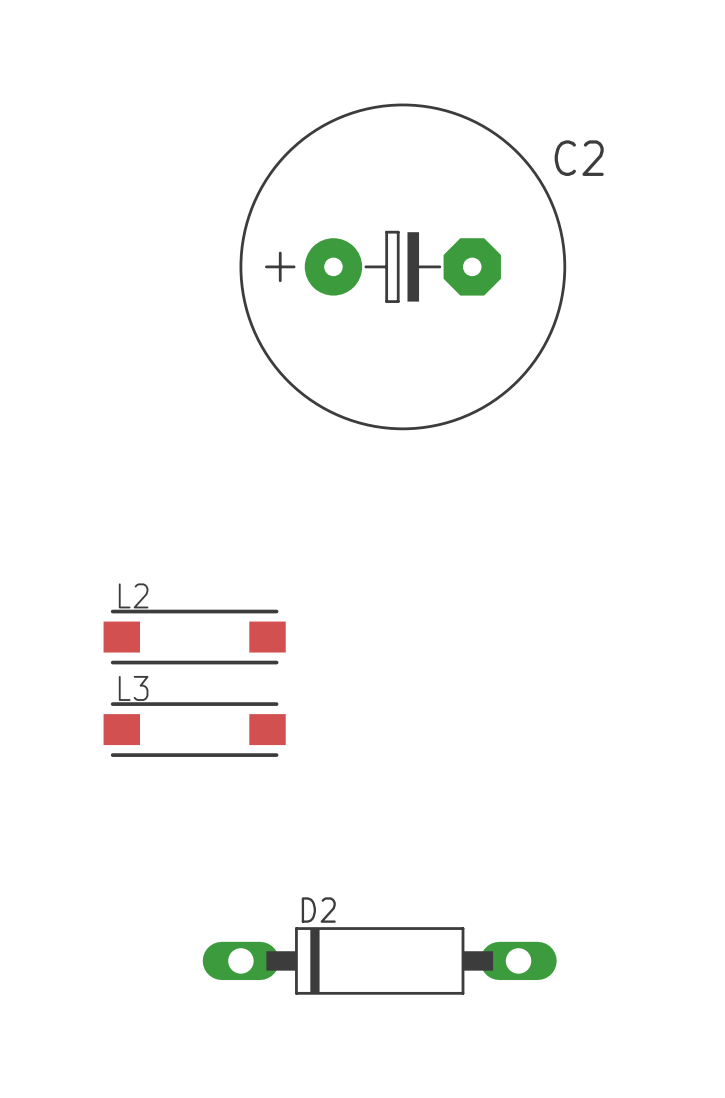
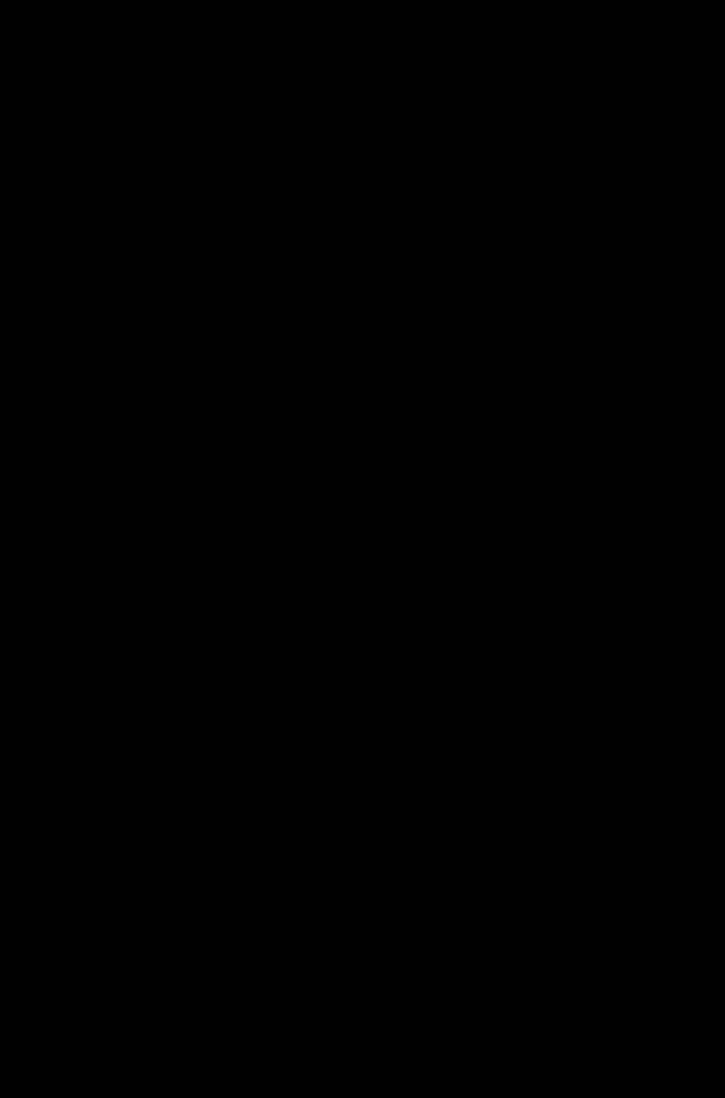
C2: (402, 266) -> none
L2: (194, 637) -> none
L3: (194, 729) -> none
D2: (379, 960) -> none

